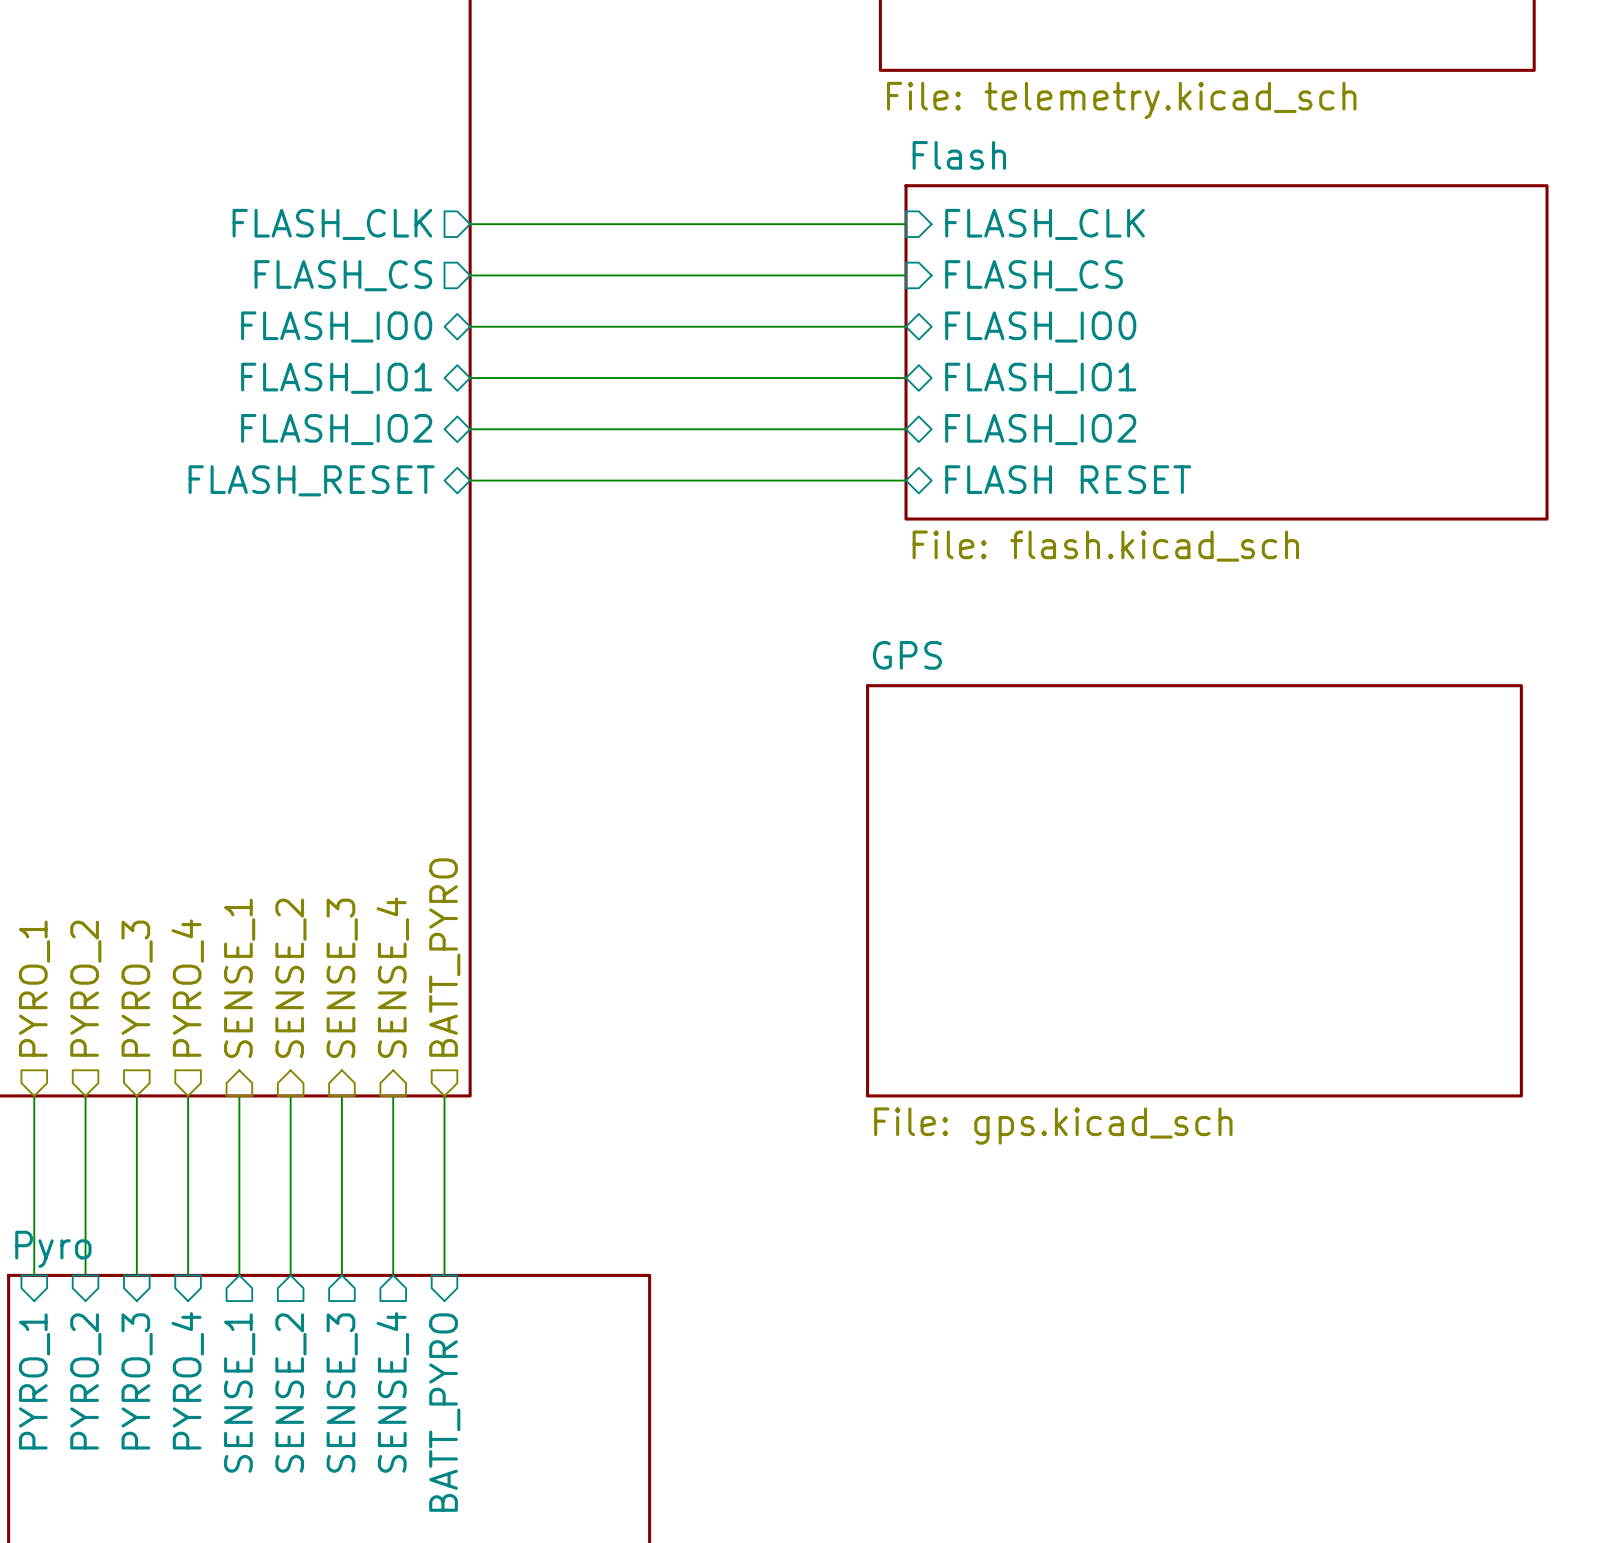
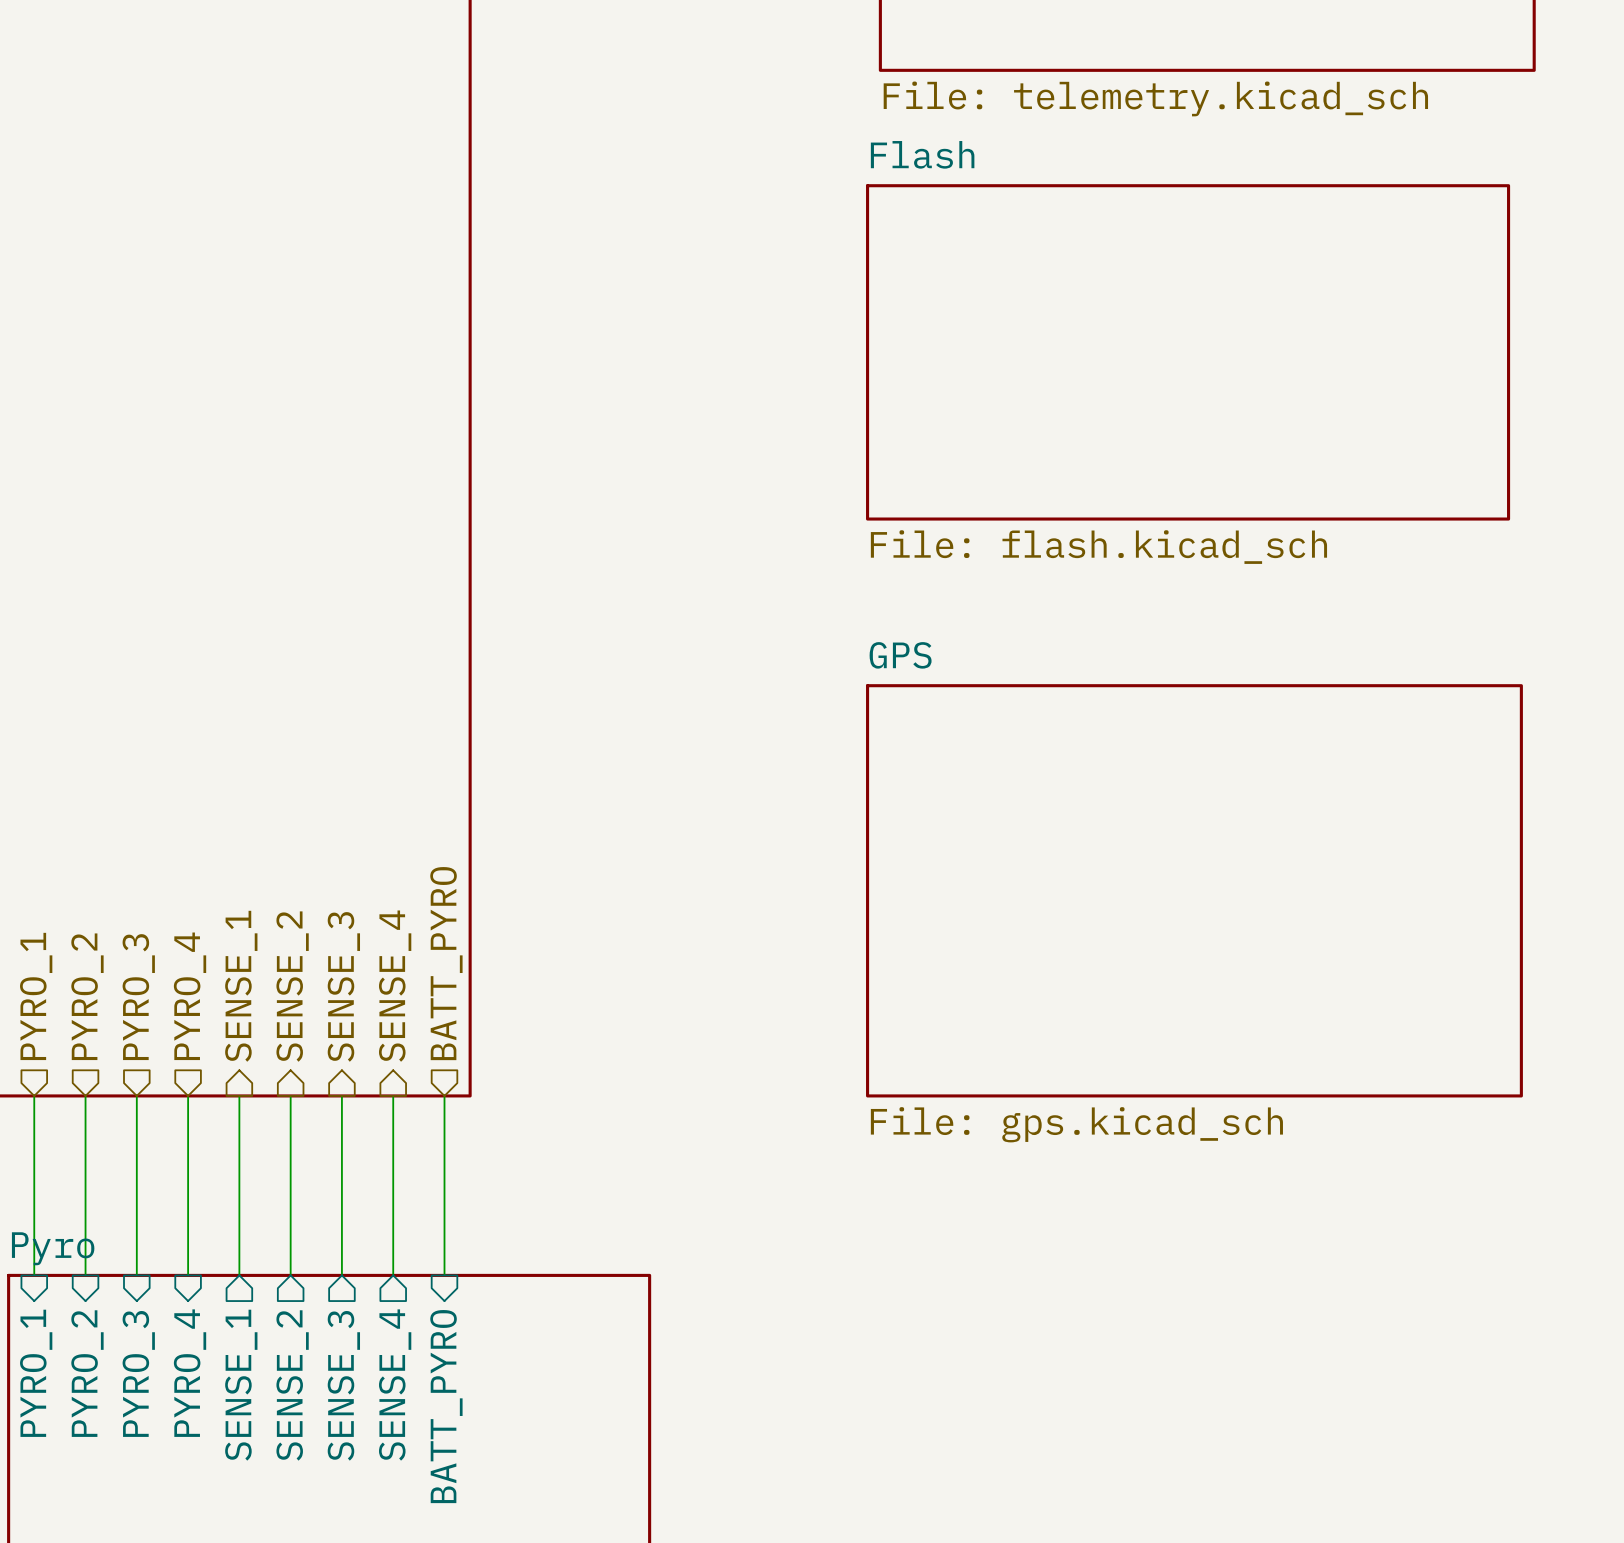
sheet pin: FLASH_CLK (332, 224) -> none
wire: (470, 224) (906, 224) -> none
sheet pin: FLASH_CLK (1045, 224) -> none
sheet pin: FLASH_CS (343, 275) -> none
wire: (470, 275) (906, 275) -> none
sheet pin: FLASH_CS (1034, 275) -> none
sheet pin: FLASH_IO0 (336, 326) -> none
wire: (470, 326) (906, 326) -> none
sheet pin: FLASH_IO0 (1040, 326) -> none
sheet Flash position: (1226, 352) -> (1188, 352)
sheet pin: FLASH_IO1 (336, 378) -> none
wire: (470, 378) (906, 378) -> none
sheet pin: FLASH_IO1 (1040, 378) -> none
sheet pin: FLASH_IO2 (336, 429) -> none
wire: (470, 429) (906, 429) -> none
sheet pin: FLASH_IO2 (1040, 429) -> none
sheet pin: FLASH RESET (1068, 479) -> none
sheet pin: FLASH_RESET (311, 480) -> none
wire: (470, 480) (906, 480) -> none

